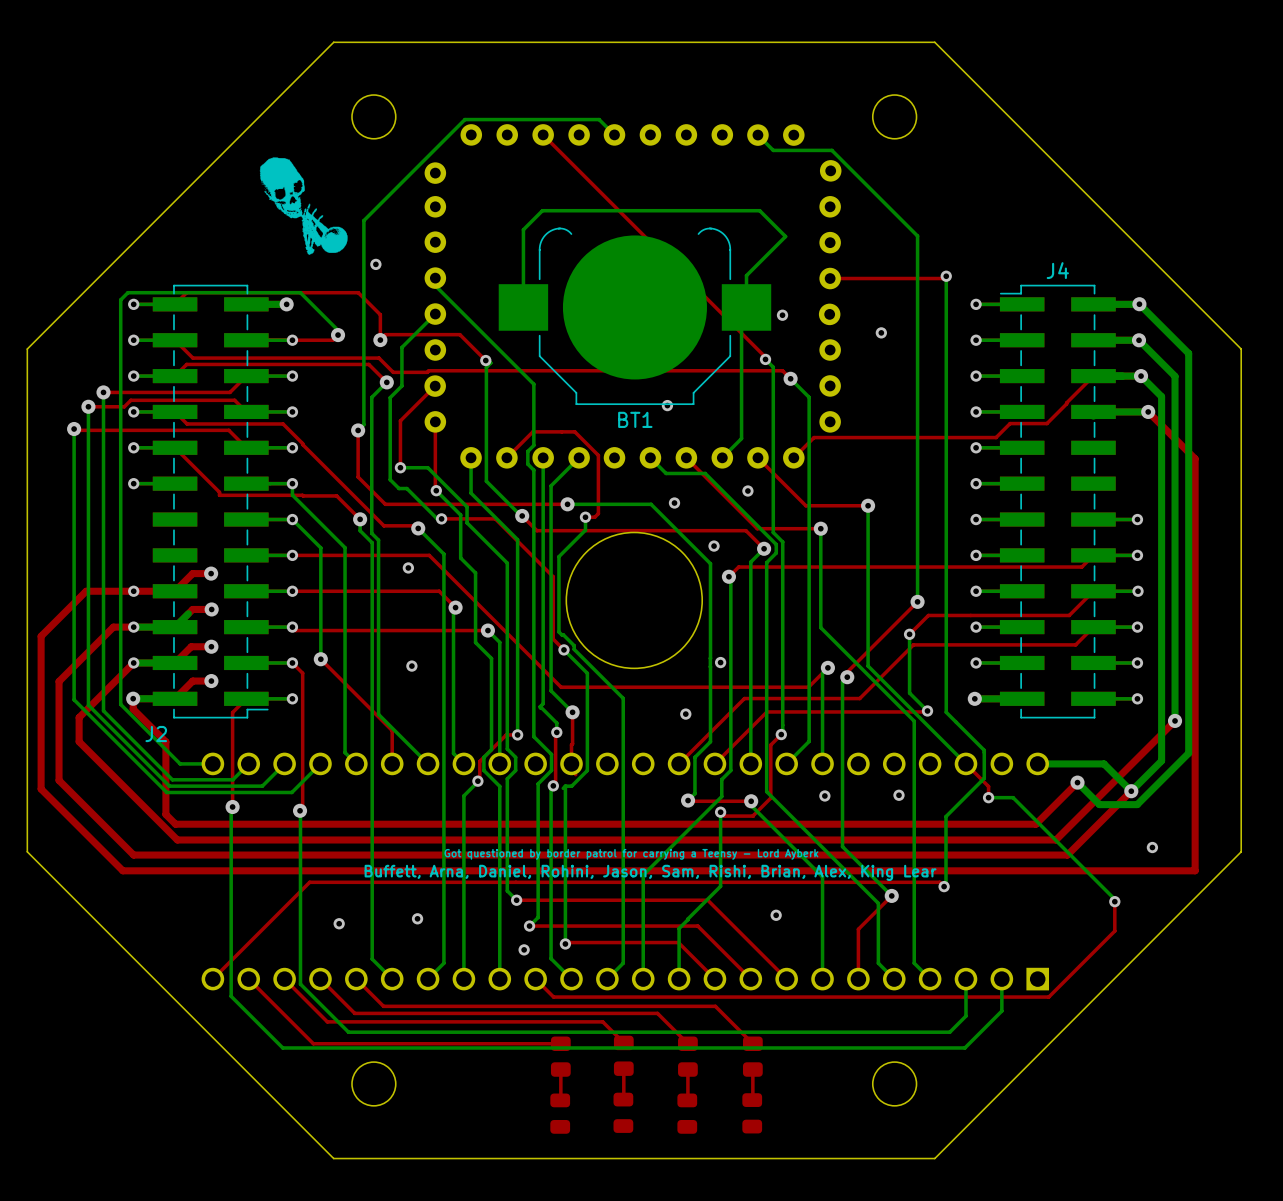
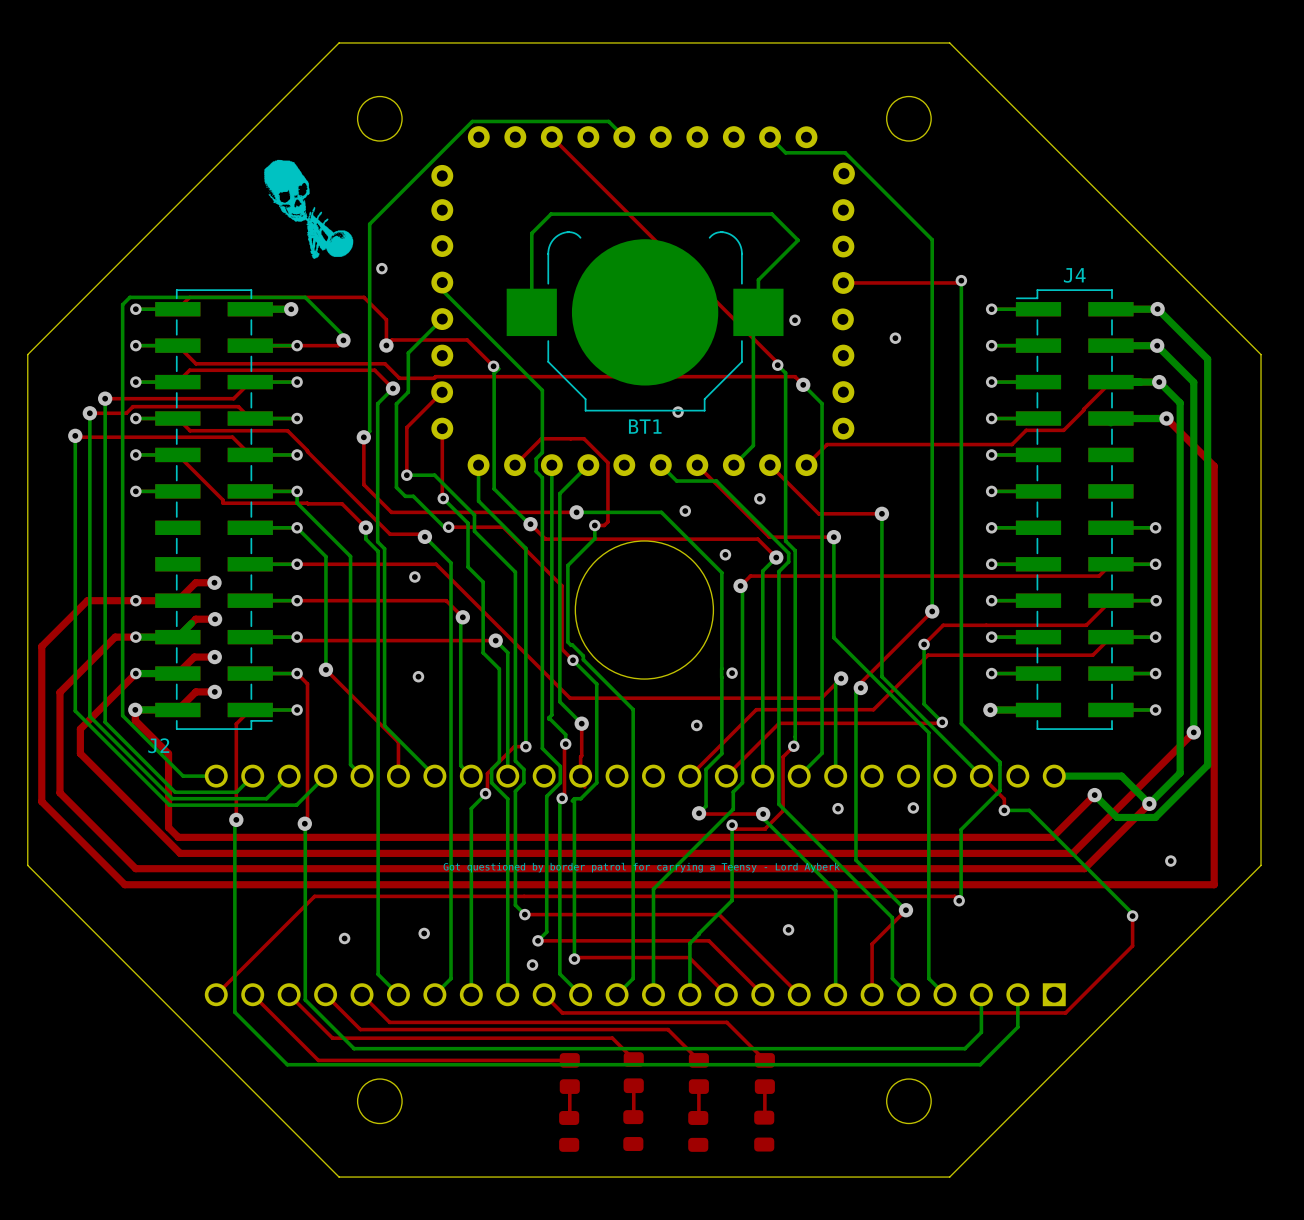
text: Buffett, Arna, Daniel, Rohini, Jason, Sam, Rishi, Brian, Alex, King Lear (650, 872) -> none

